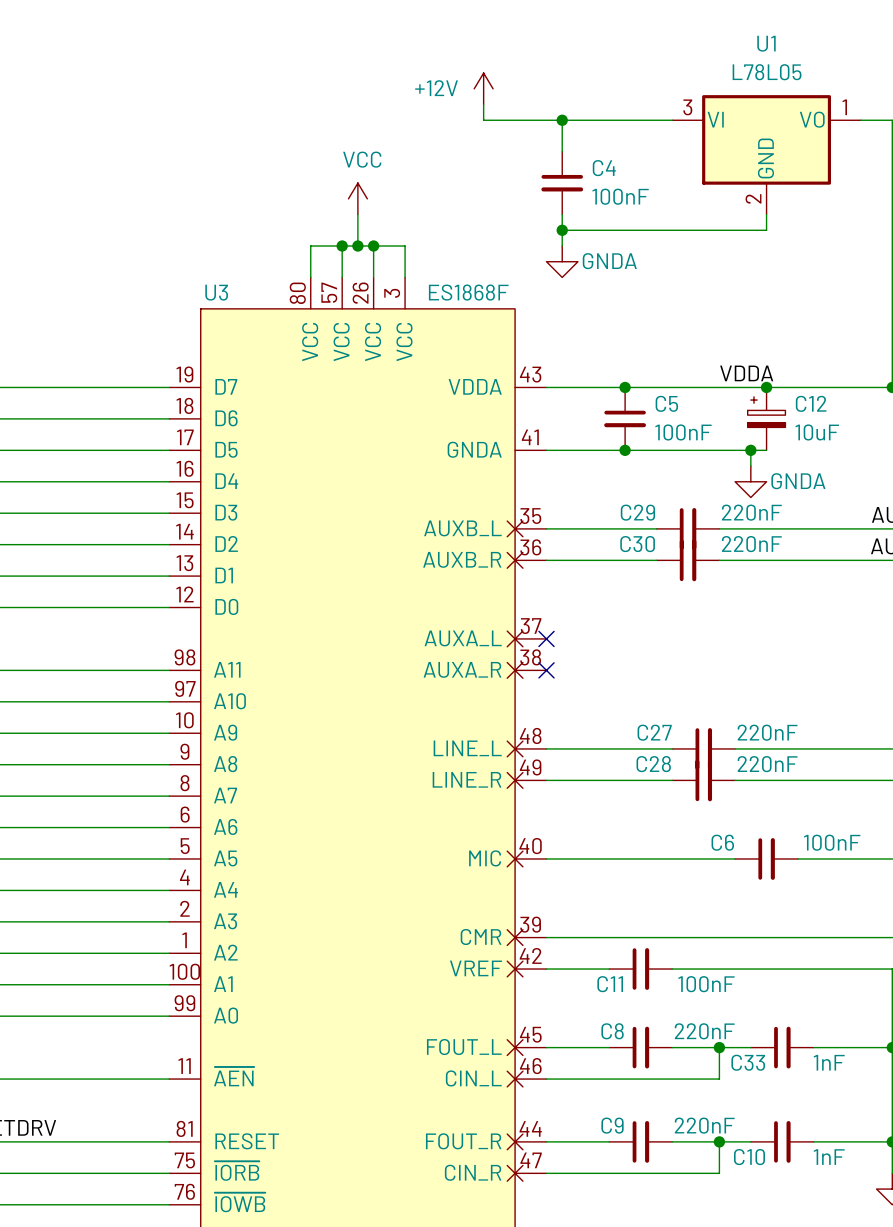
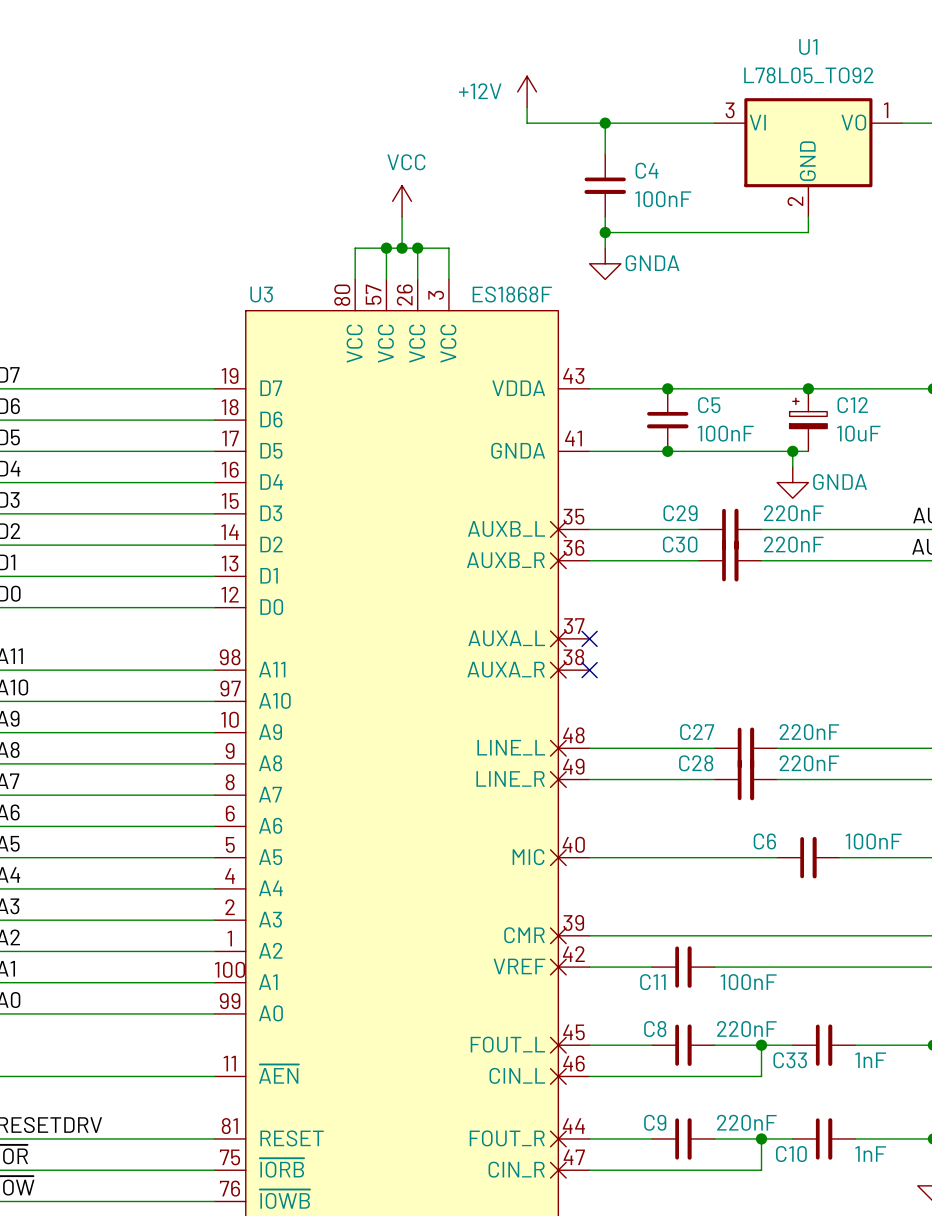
U1 value: L78L05 (767, 72) -> L78L05_TO92 (808, 75)
label: VDDA (746, 373) -> none

